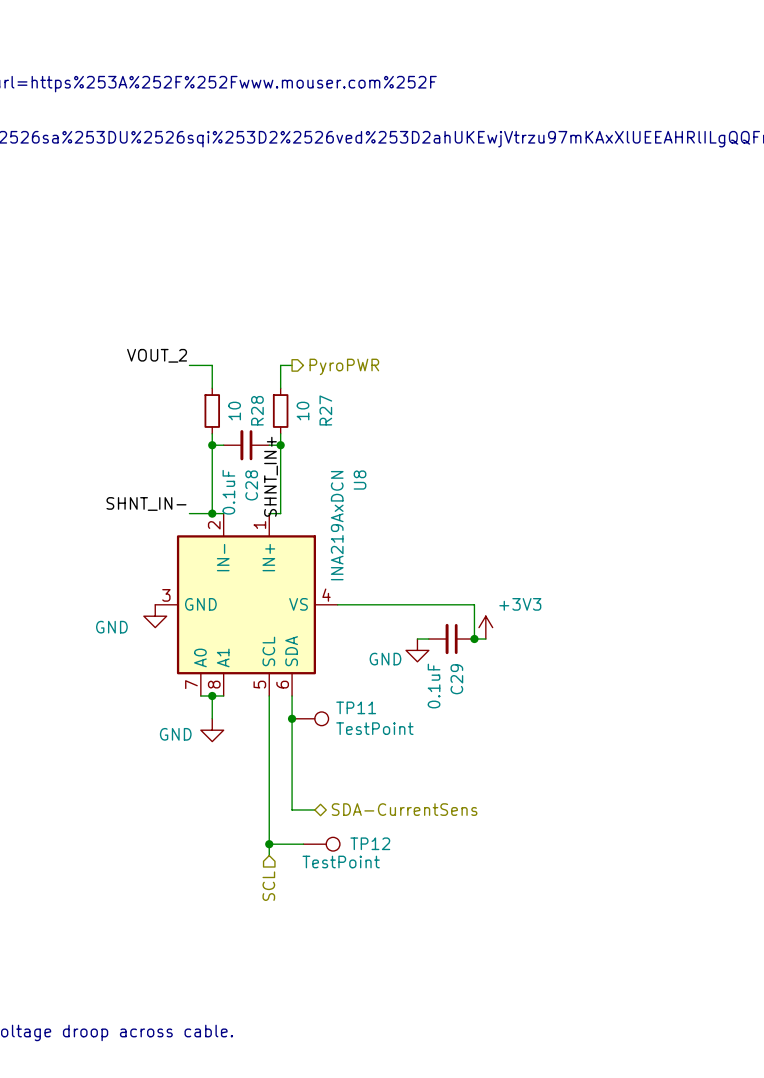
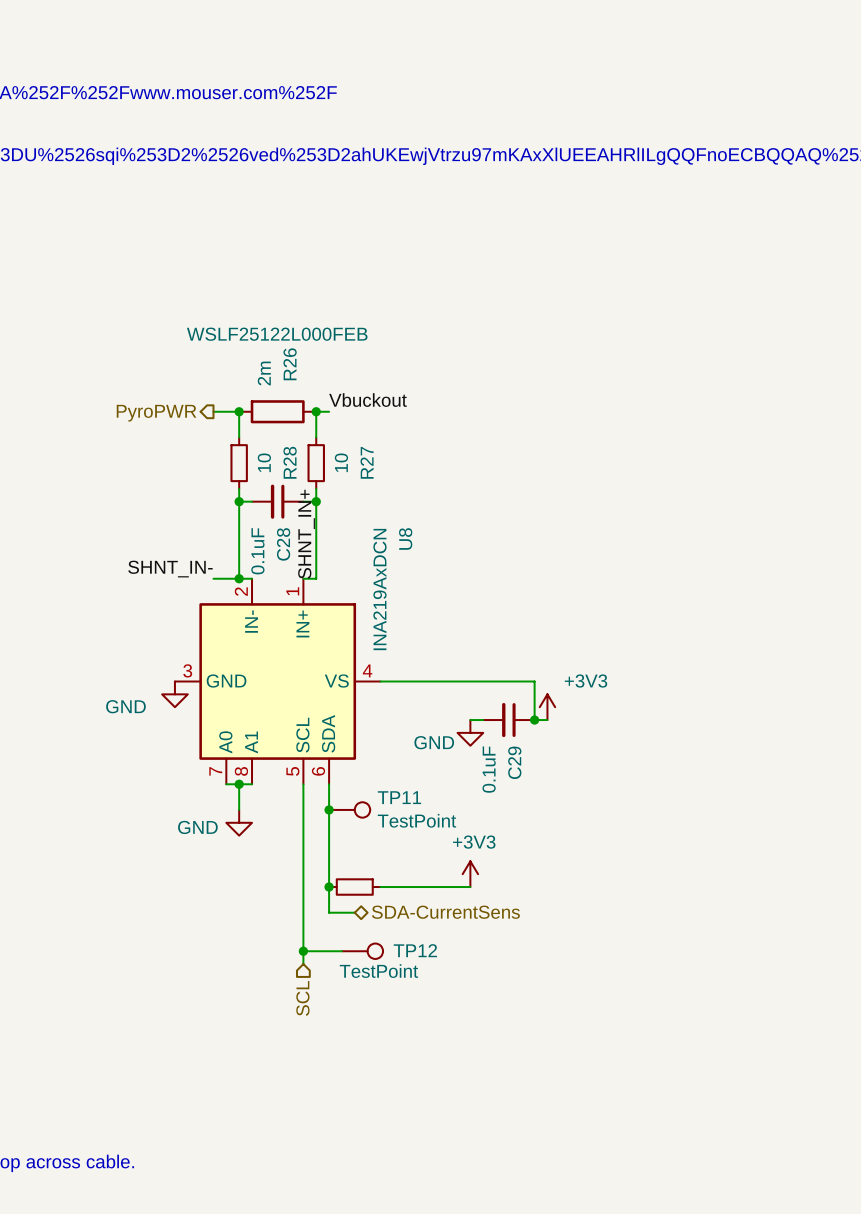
label: VOUT_2 (157, 355) -> none
label: none -> Vbuckout (367, 400)
junction: none -> (239, 411)
R26: none -> 2m (277, 411)
junction: none -> (316, 411)
hierarchical label rotation: 0° (344, 366) -> 180° (156, 413)
hierarchical label position: PyroPWR (344, 366) -> PyroPWR (156, 413)
power symbol: none -> +3V3 (470, 874)
junction: none -> (329, 887)
part: none -> (354, 887)
wire: none -> (380, 887) (470, 887)

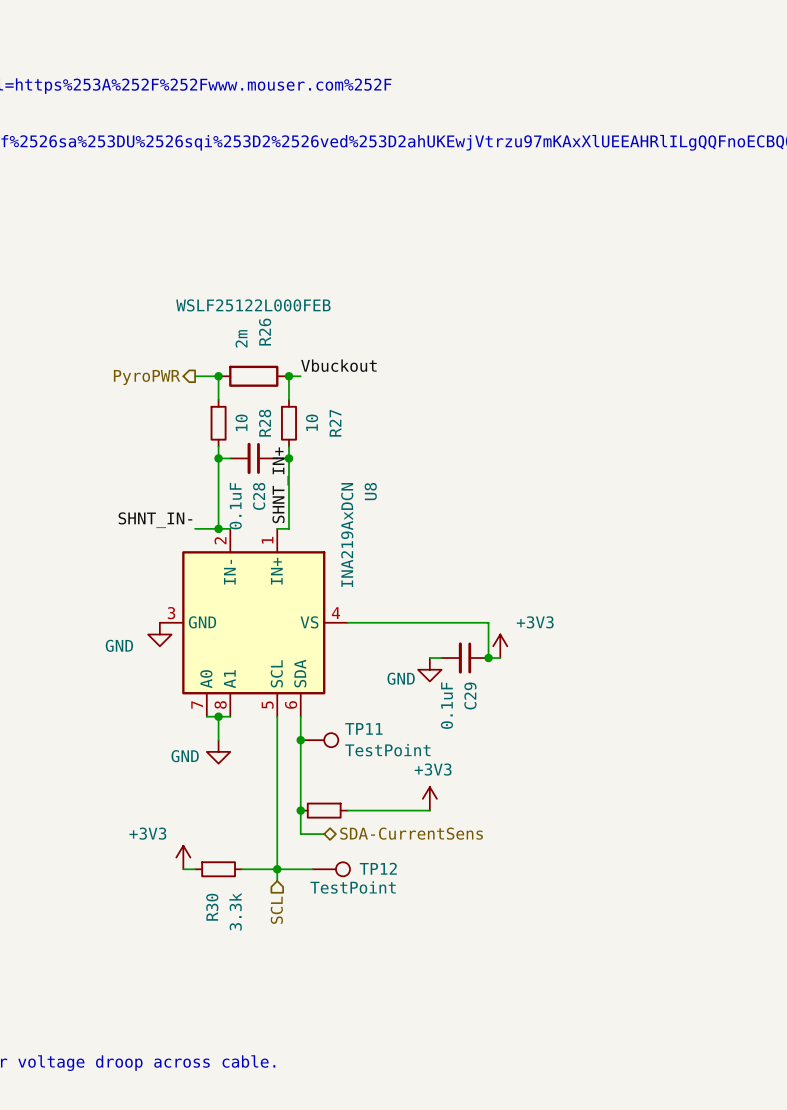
power symbol: none -> +3V3 (183, 857)
wire: none -> (183, 869) (195, 869)
R30: none -> 3.3k (218, 869)
wire: none -> (242, 869) (277, 869)

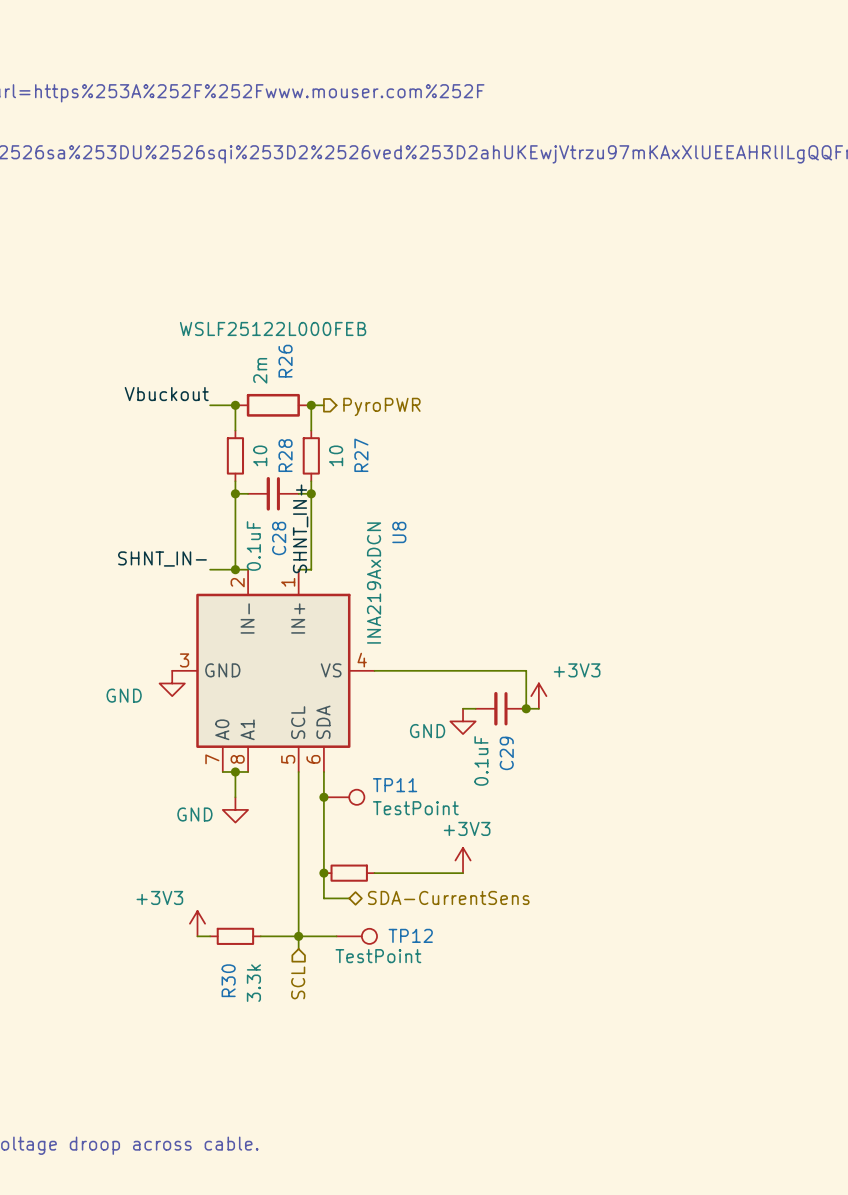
label position: Vbuckout (338, 365) -> Vbuckout (166, 394)
hierarchical label rotation: 0° (147, 377) -> 180° (381, 406)
hierarchical label position: PyroPWR (147, 377) -> PyroPWR (381, 406)

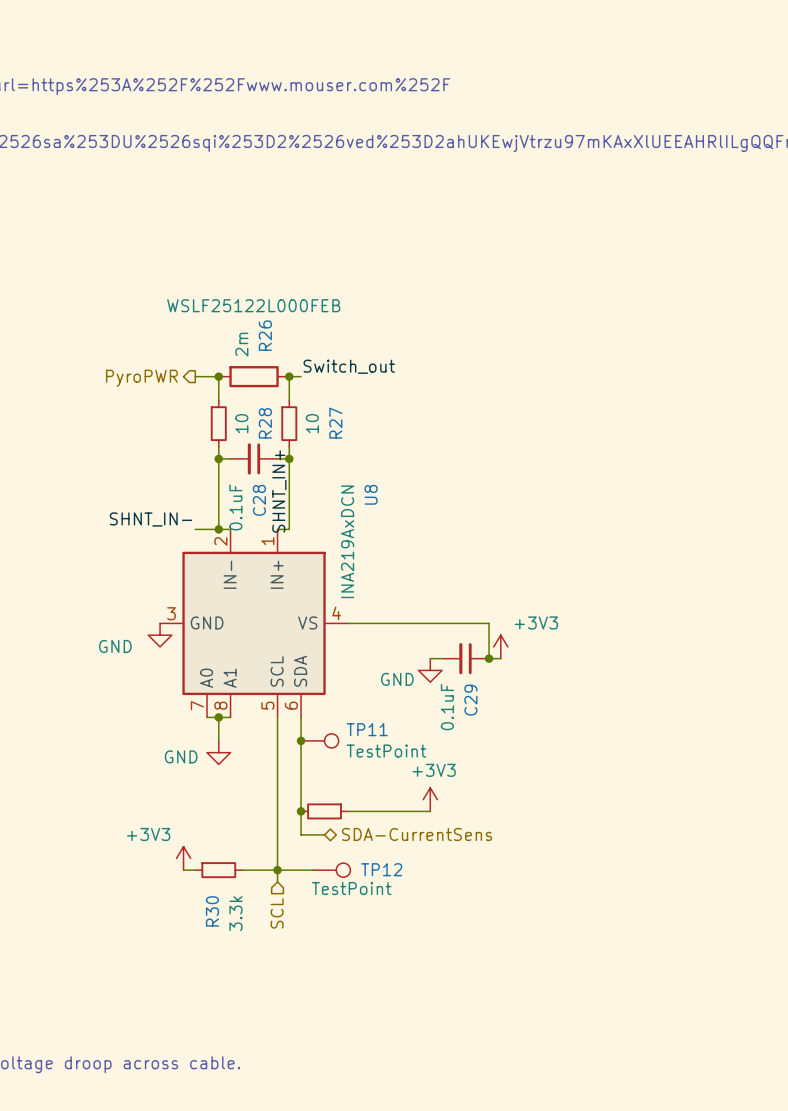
label: Vbuckout (166, 394) -> none
label: none -> Switch_out (349, 366)
hierarchical label rotation: 0° (381, 406) -> 180° (141, 378)
hierarchical label position: PyroPWR (381, 406) -> PyroPWR (141, 378)

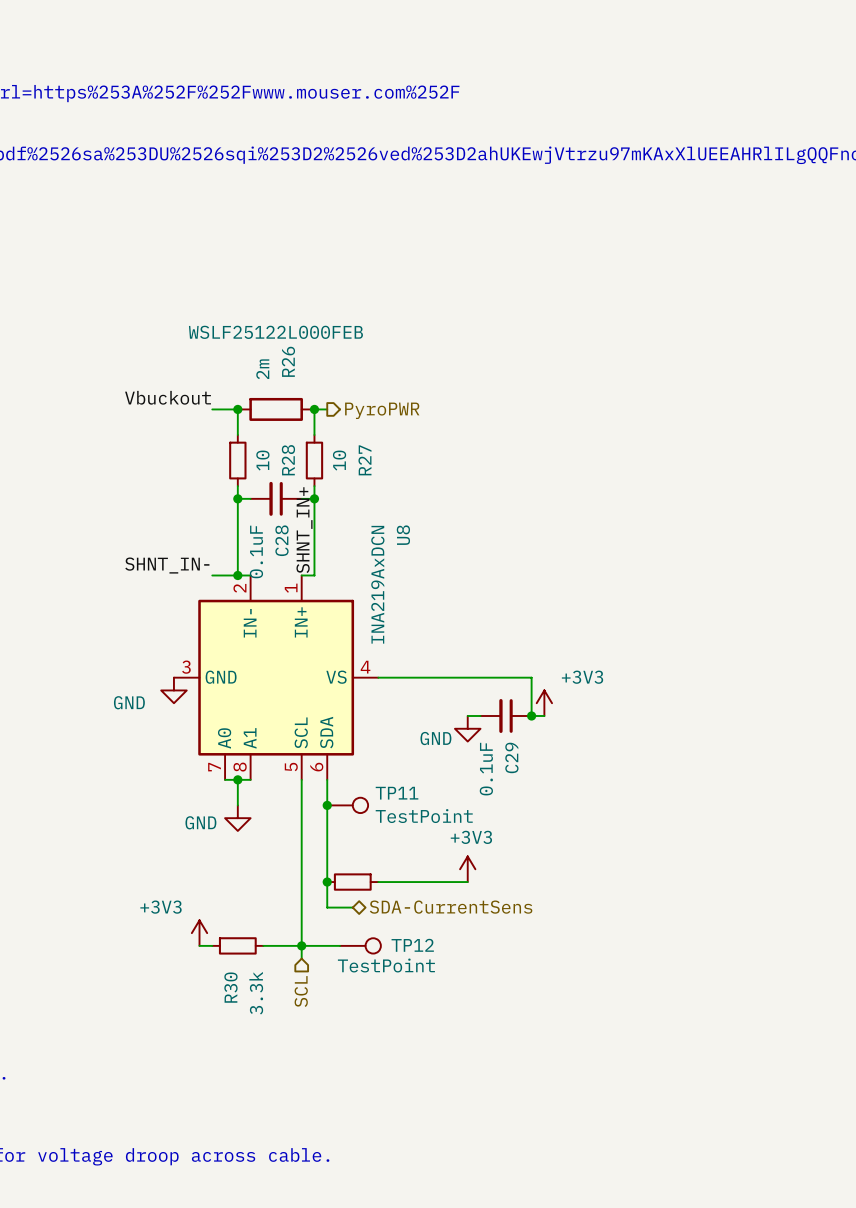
label: none -> Vbuckout (168, 397)
label: Switch_out (349, 366) -> none
hierarchical label rotation: 0° (141, 378) -> 180° (382, 410)
hierarchical label position: PyroPWR (141, 378) -> PyroPWR (382, 410)

